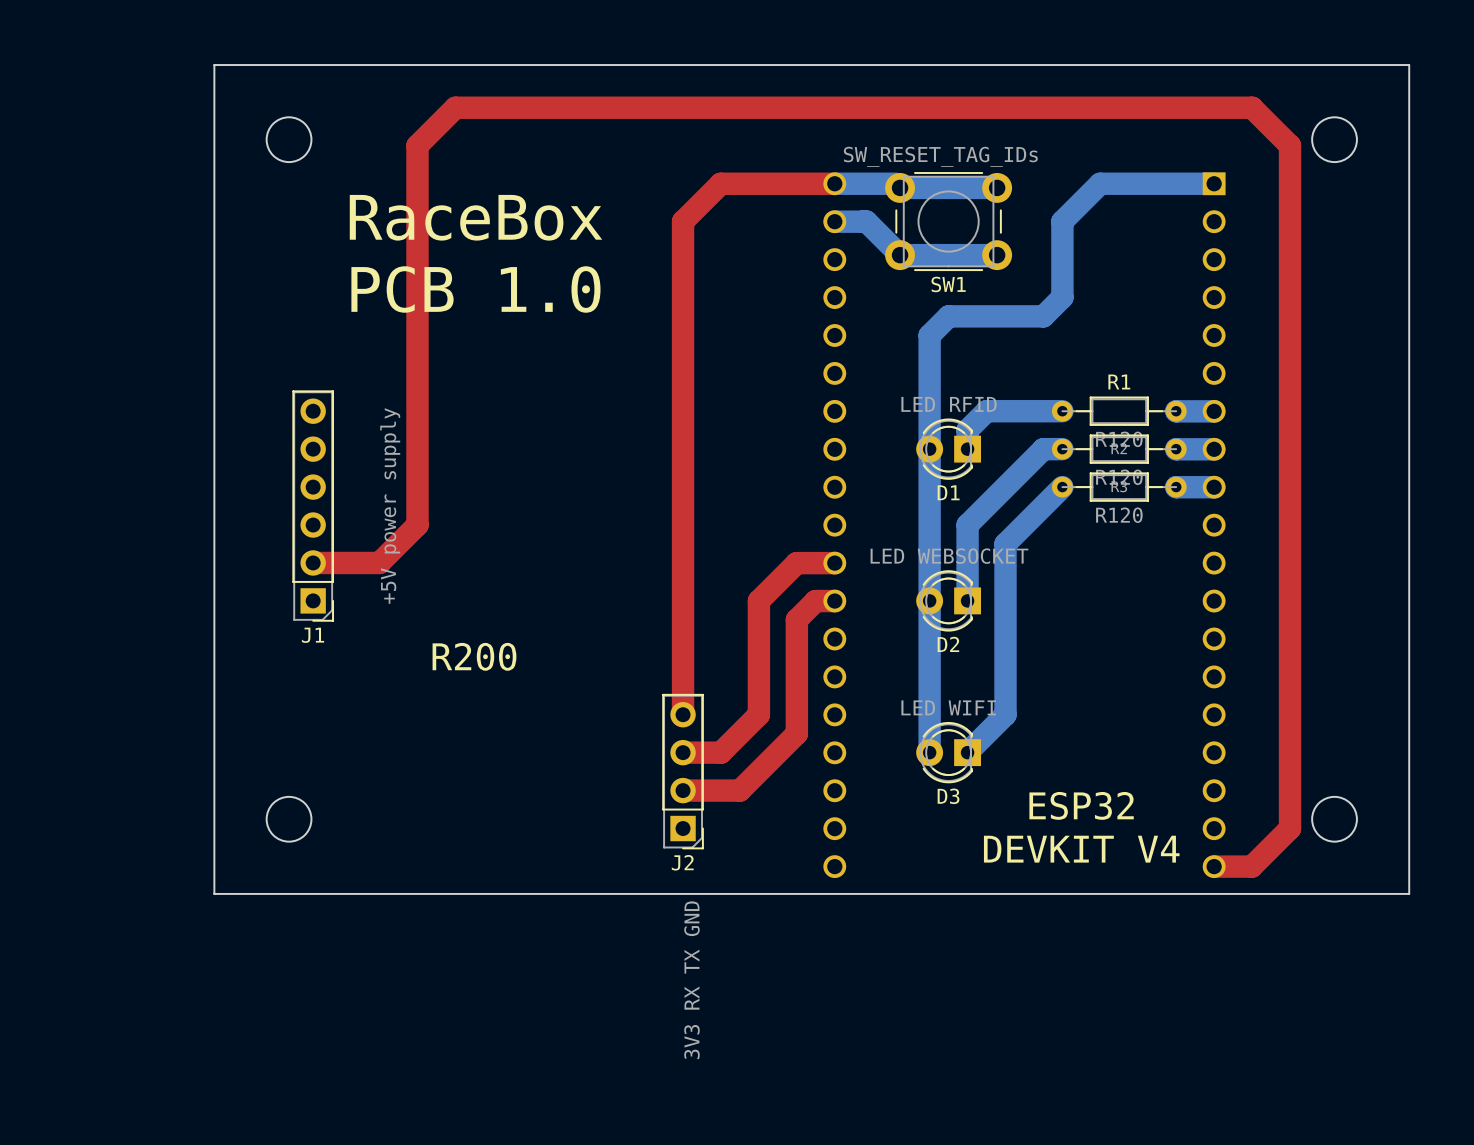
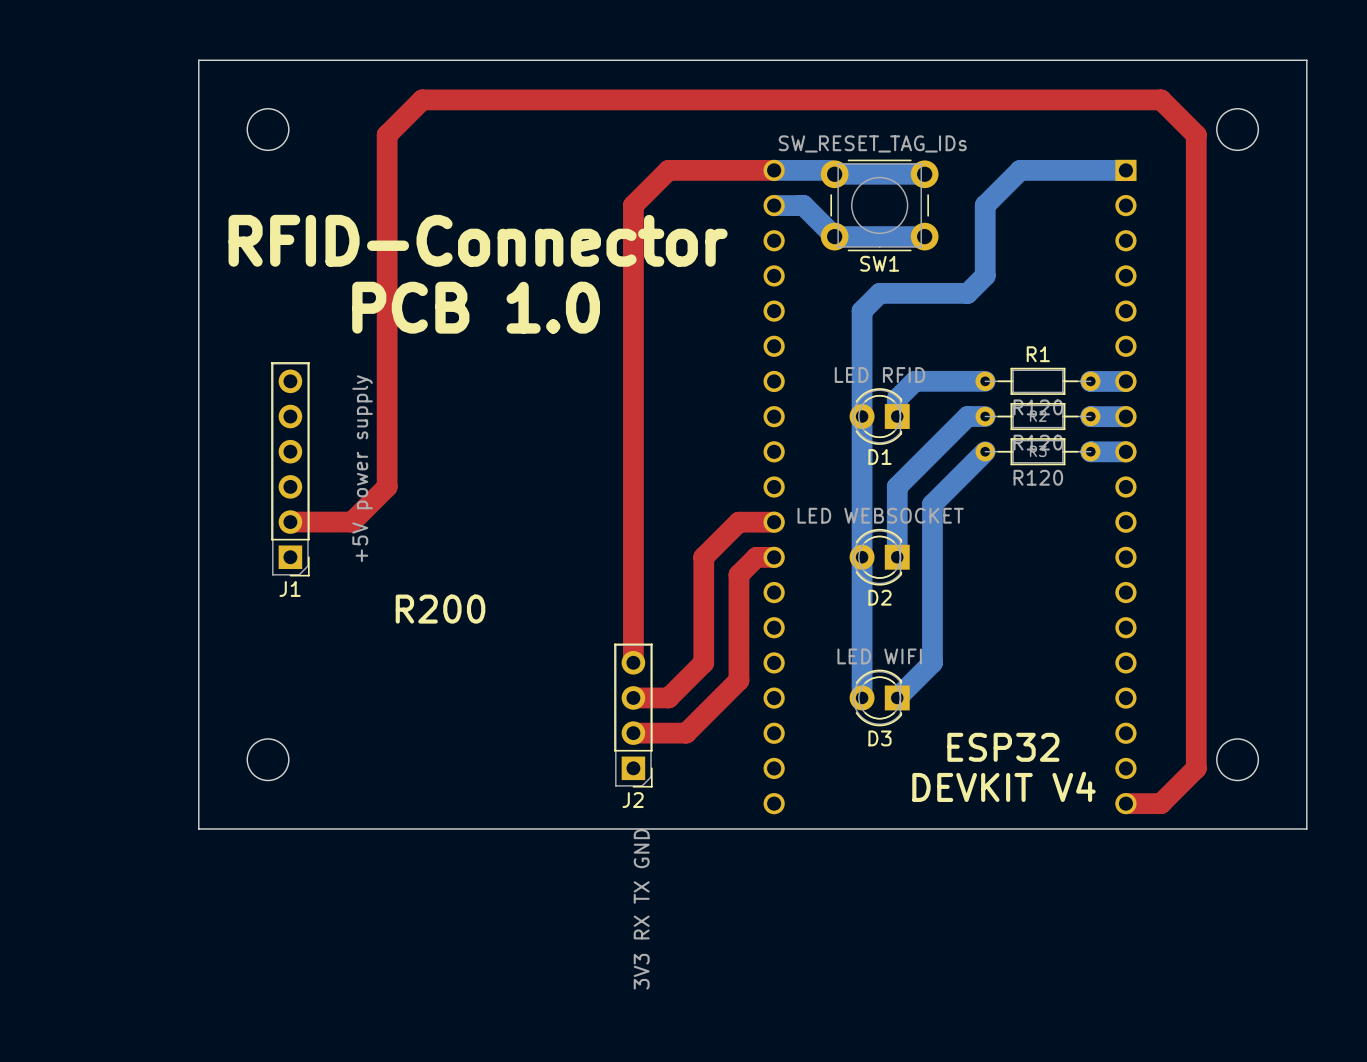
text: RaceBox (476, 217) -> none
text: none -> RFID-Connector (478, 240)
text position: PCB 1.0 (475, 289) -> PCB 1.0 (476, 307)

